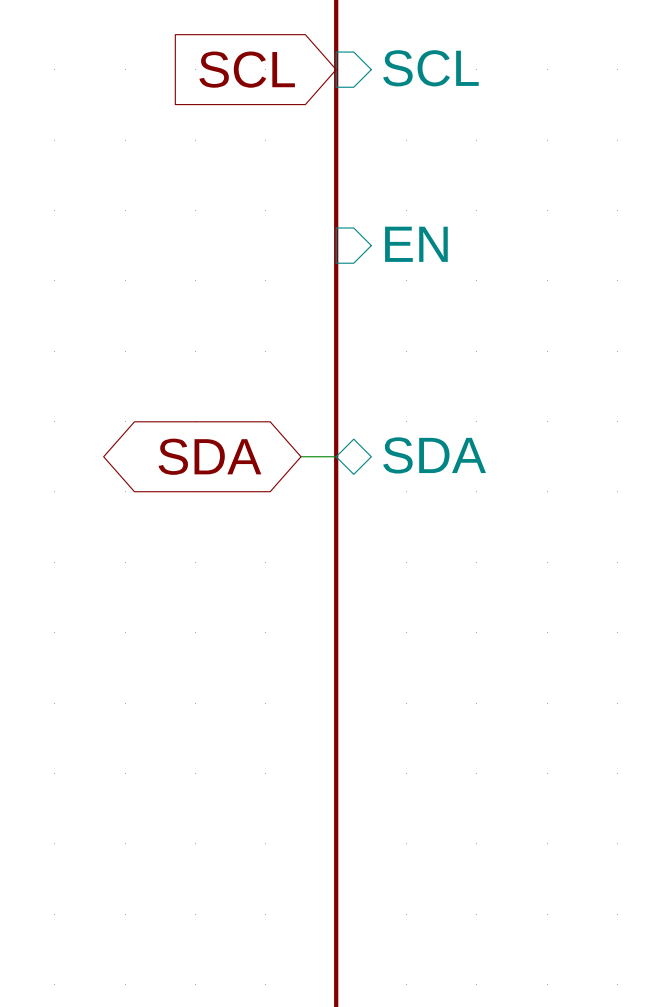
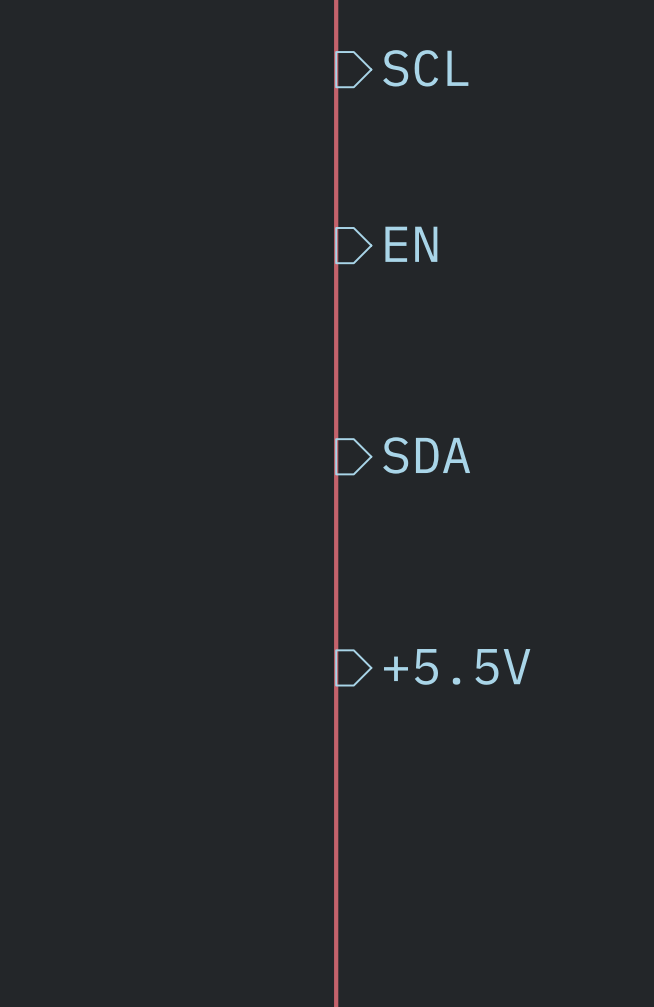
global label: SCL (247, 69) -> none
sheet pin shape: bidirectional (434, 455) -> input (426, 455)
global label: SDA (209, 456) -> none
wire: (300, 456) (336, 456) -> none
sheet pin: none -> +5.5V (457, 666)

